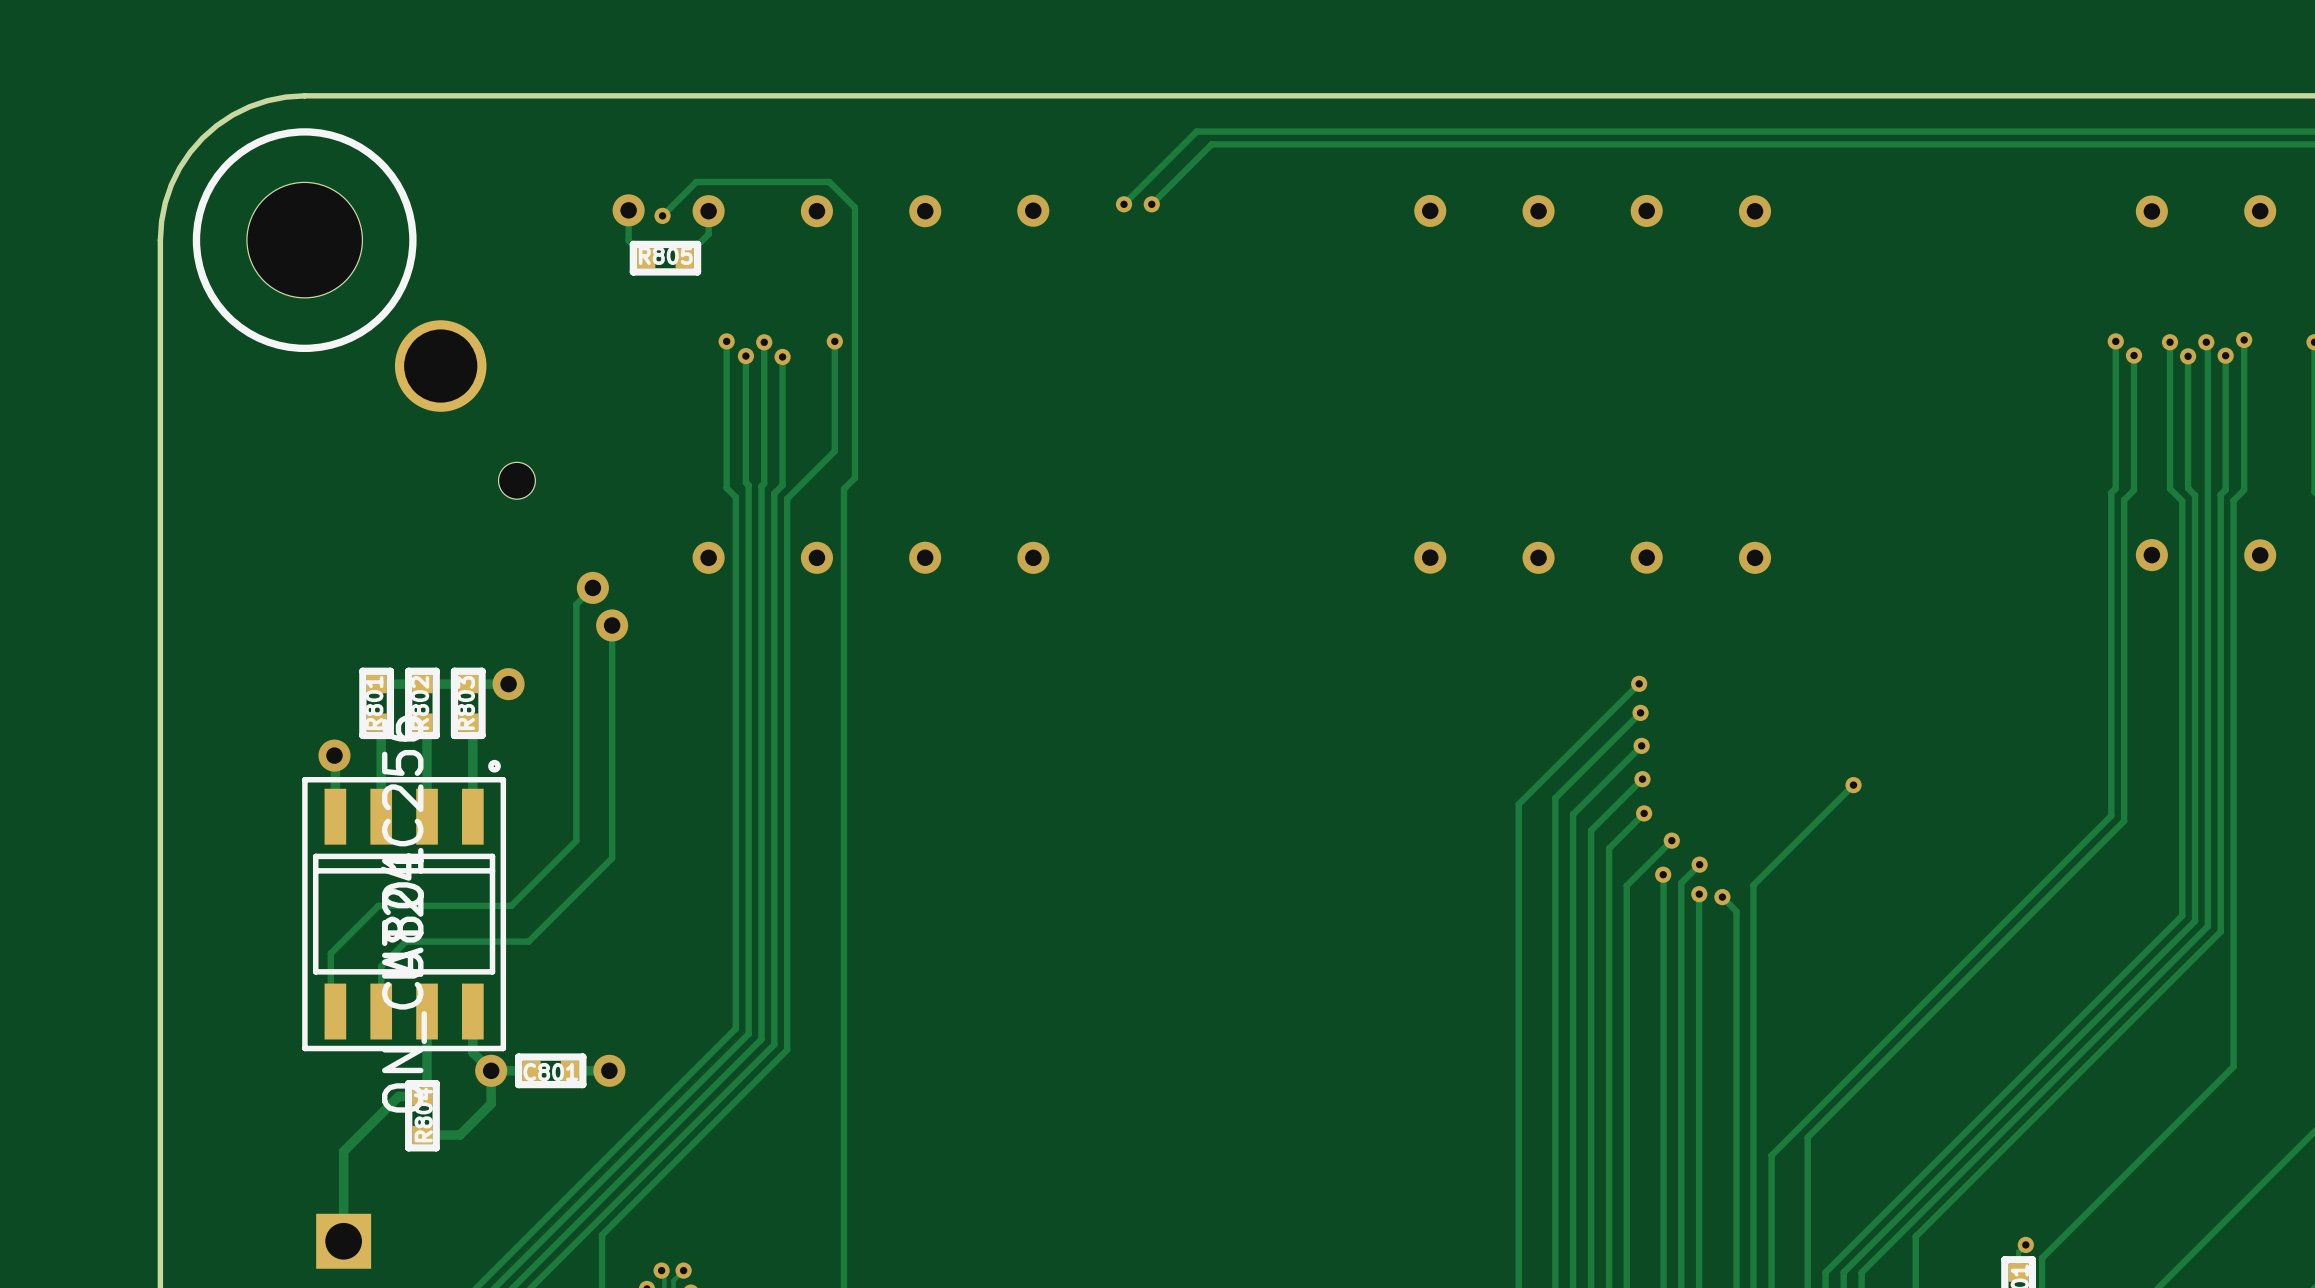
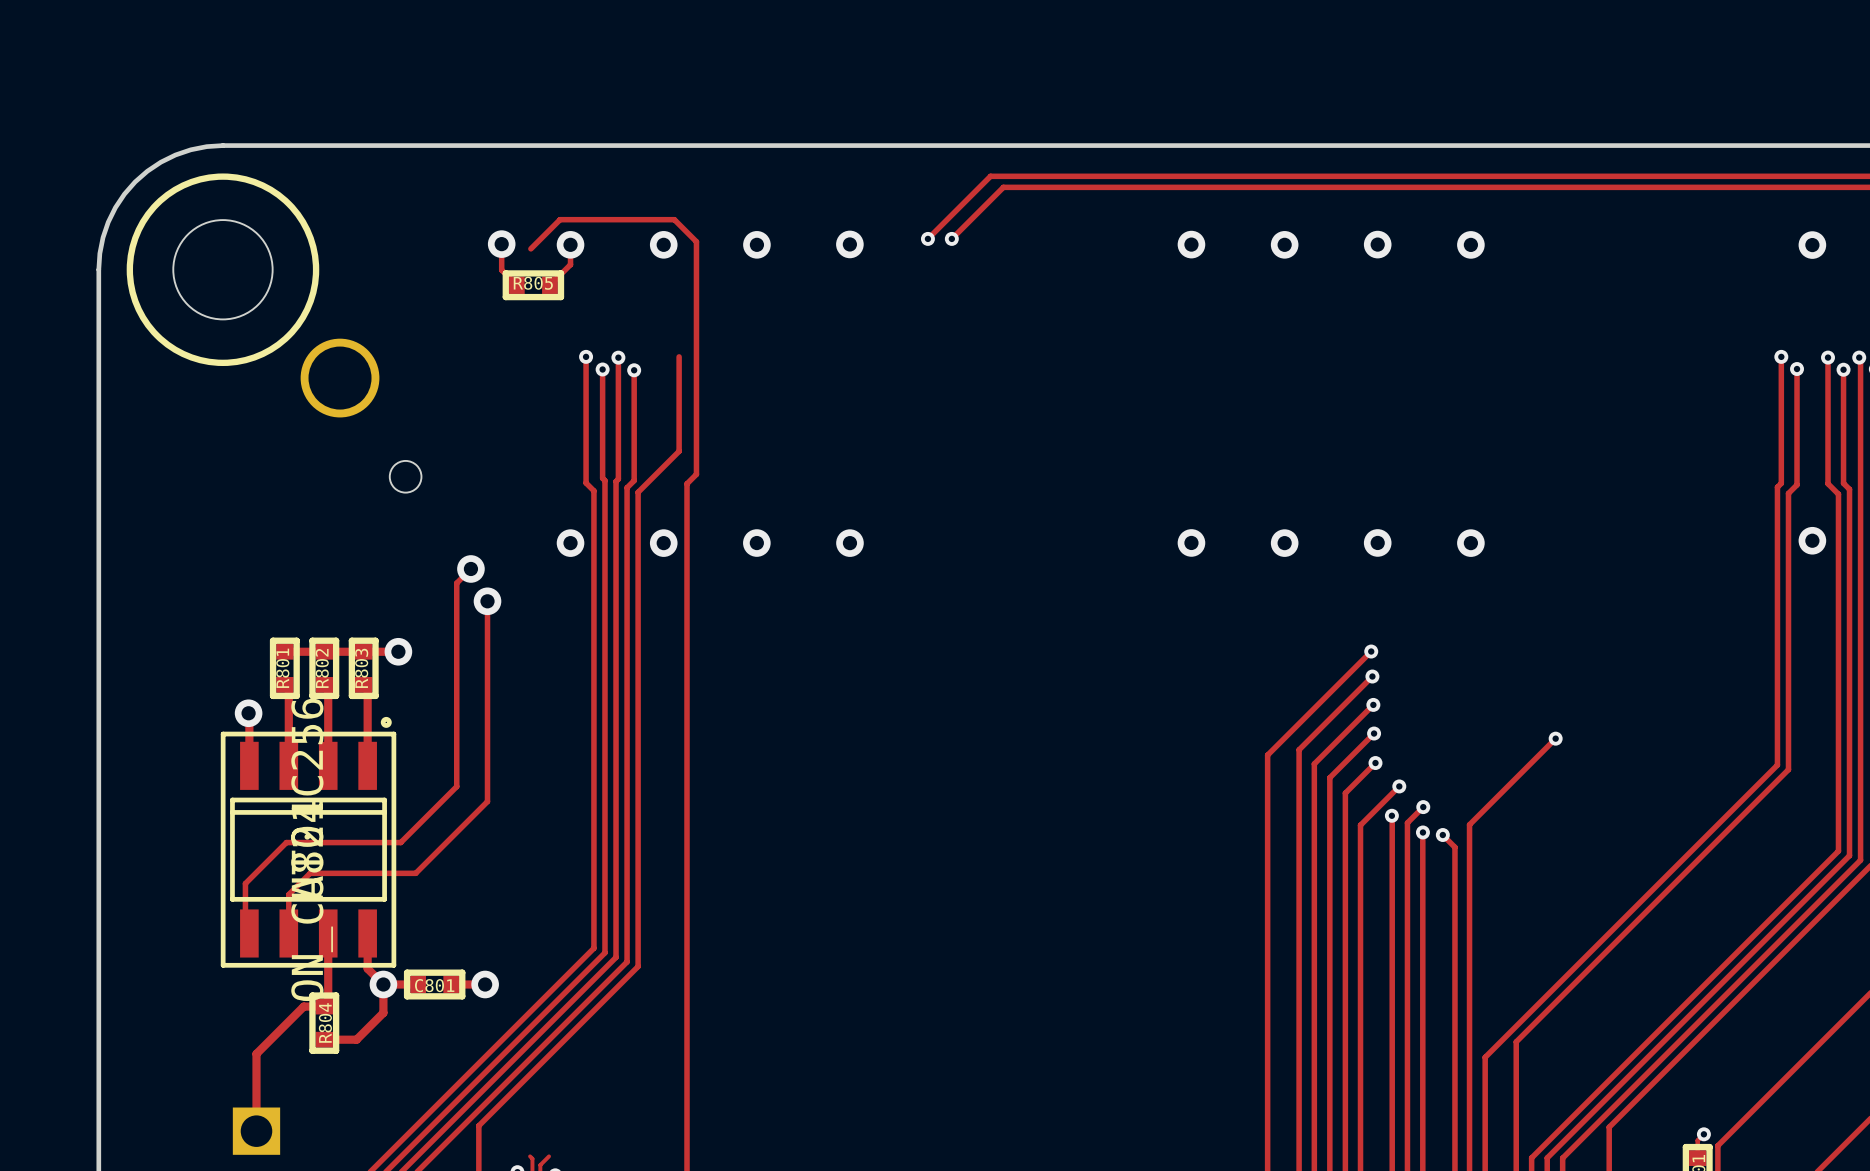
via: (662, 215) -> none
via: (834, 341) -> none
via: (661, 1270) -> none
via: (683, 1270) -> none

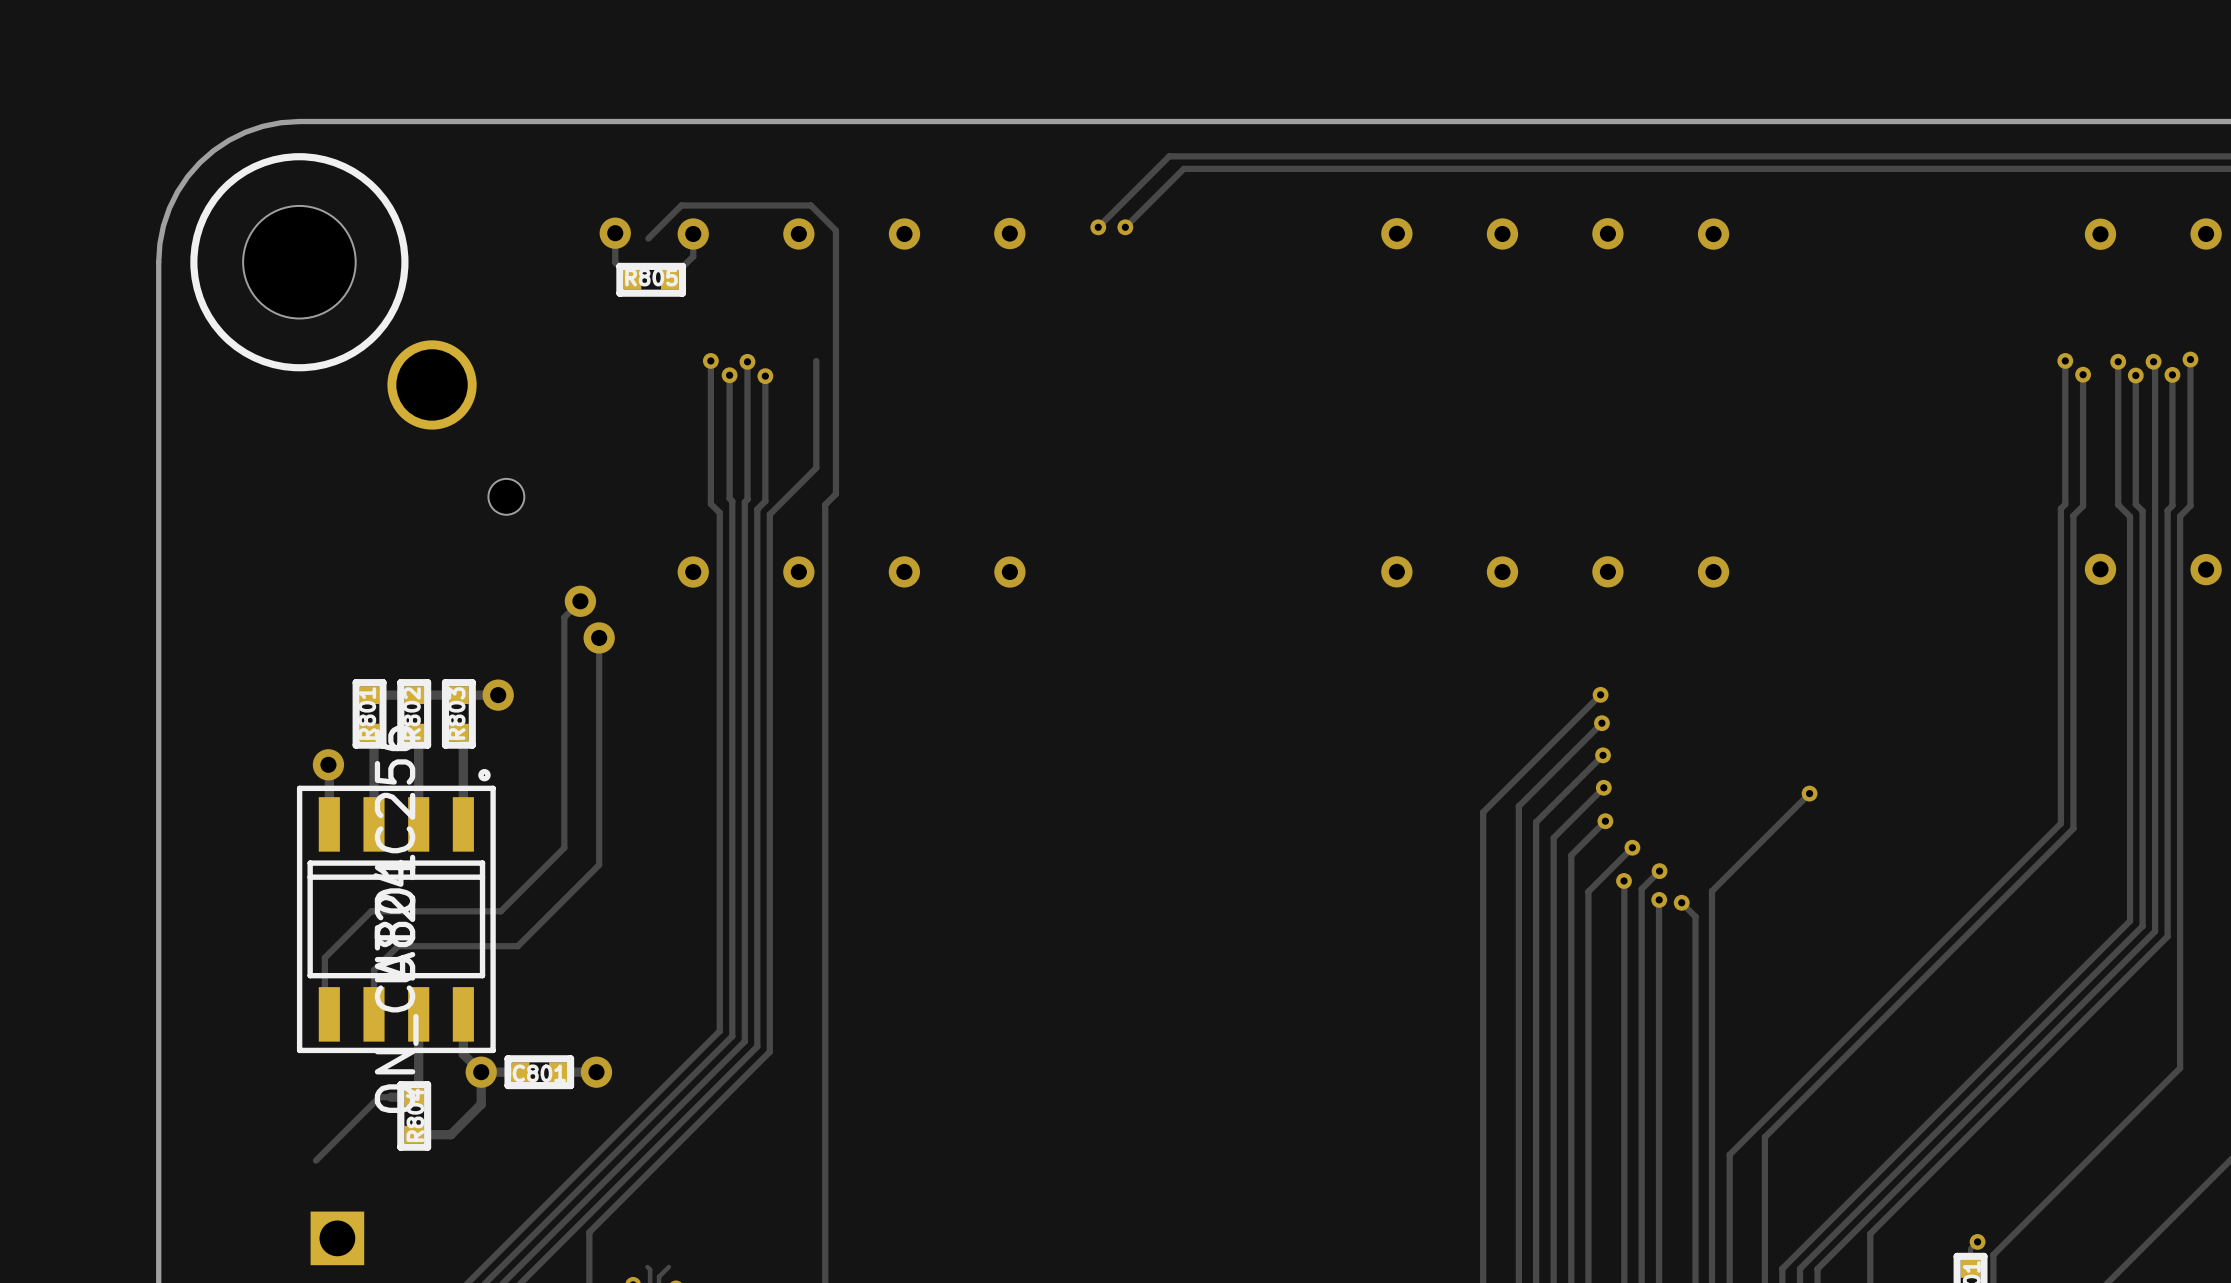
track: (303, 1006) (256, 1053) (256, 1131) -> (391, 1097) (379, 1097) (315, 1160)

